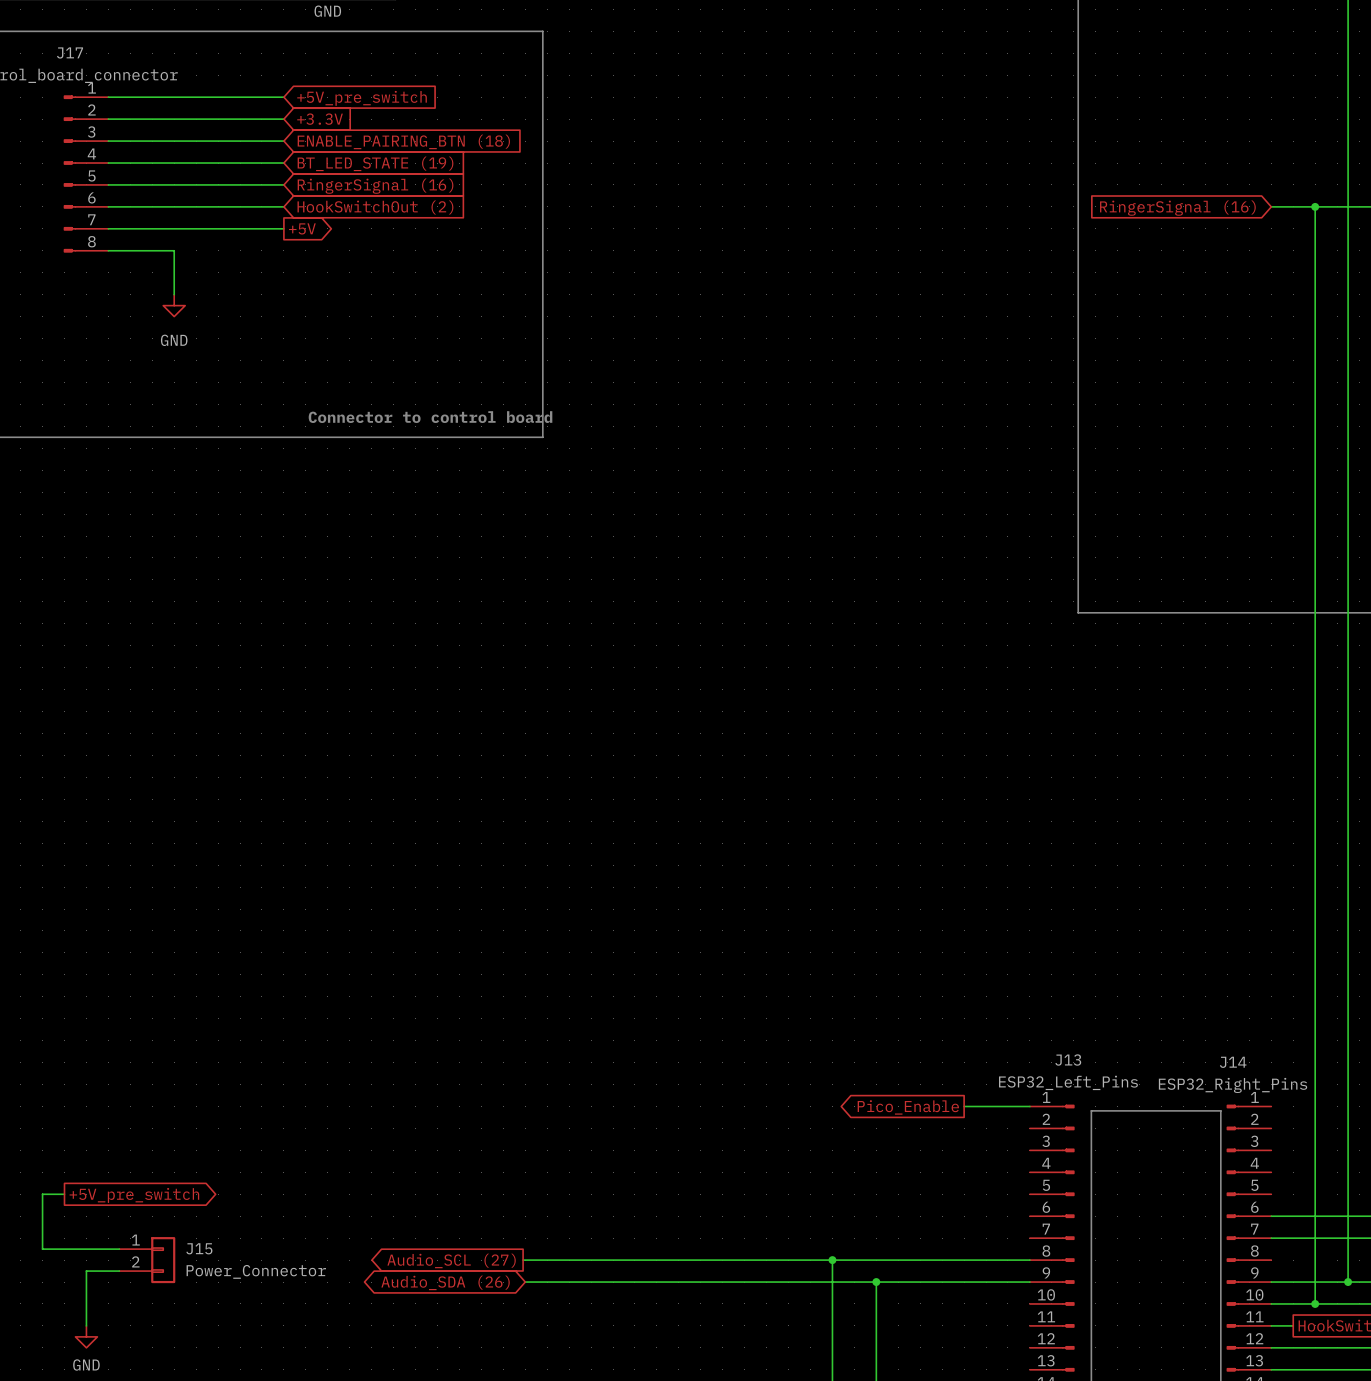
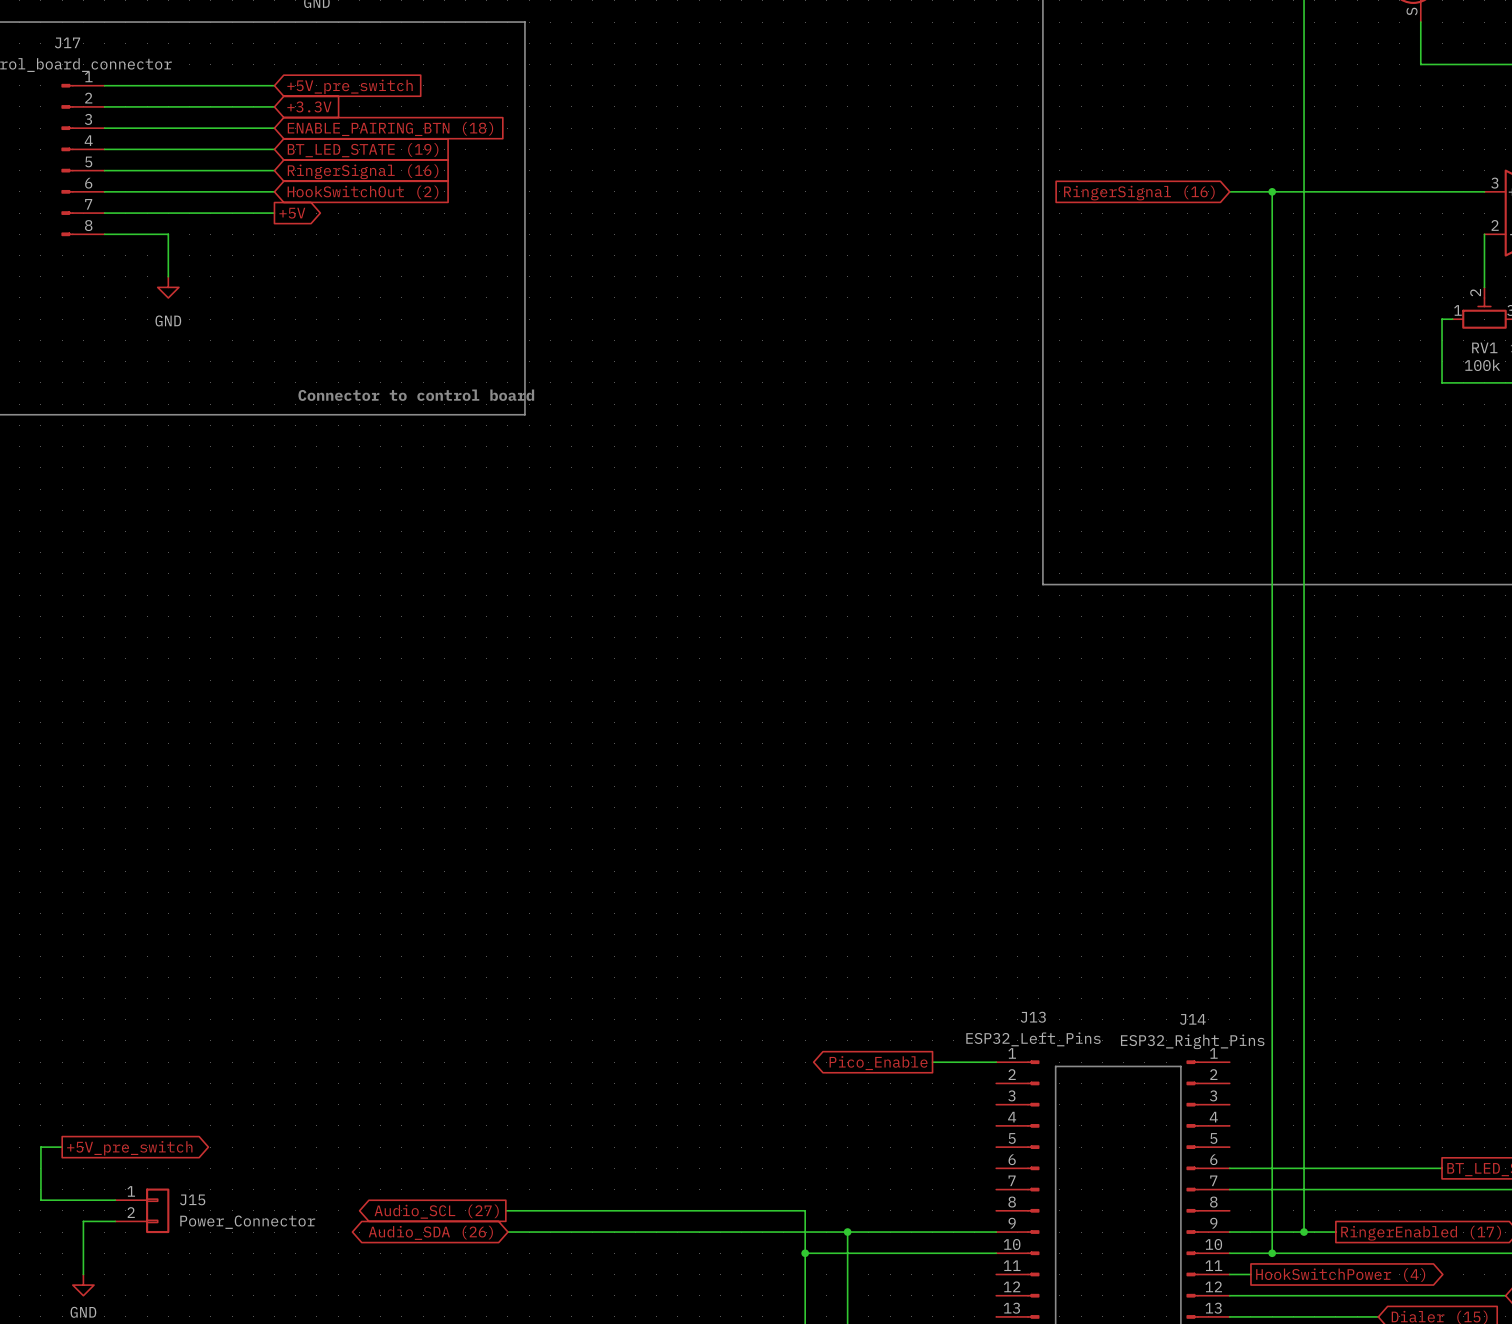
wire: (832, 1260) (1029, 1260) -> (805, 1253) (996, 1253)
junction position: (832, 1260) -> (805, 1253)

